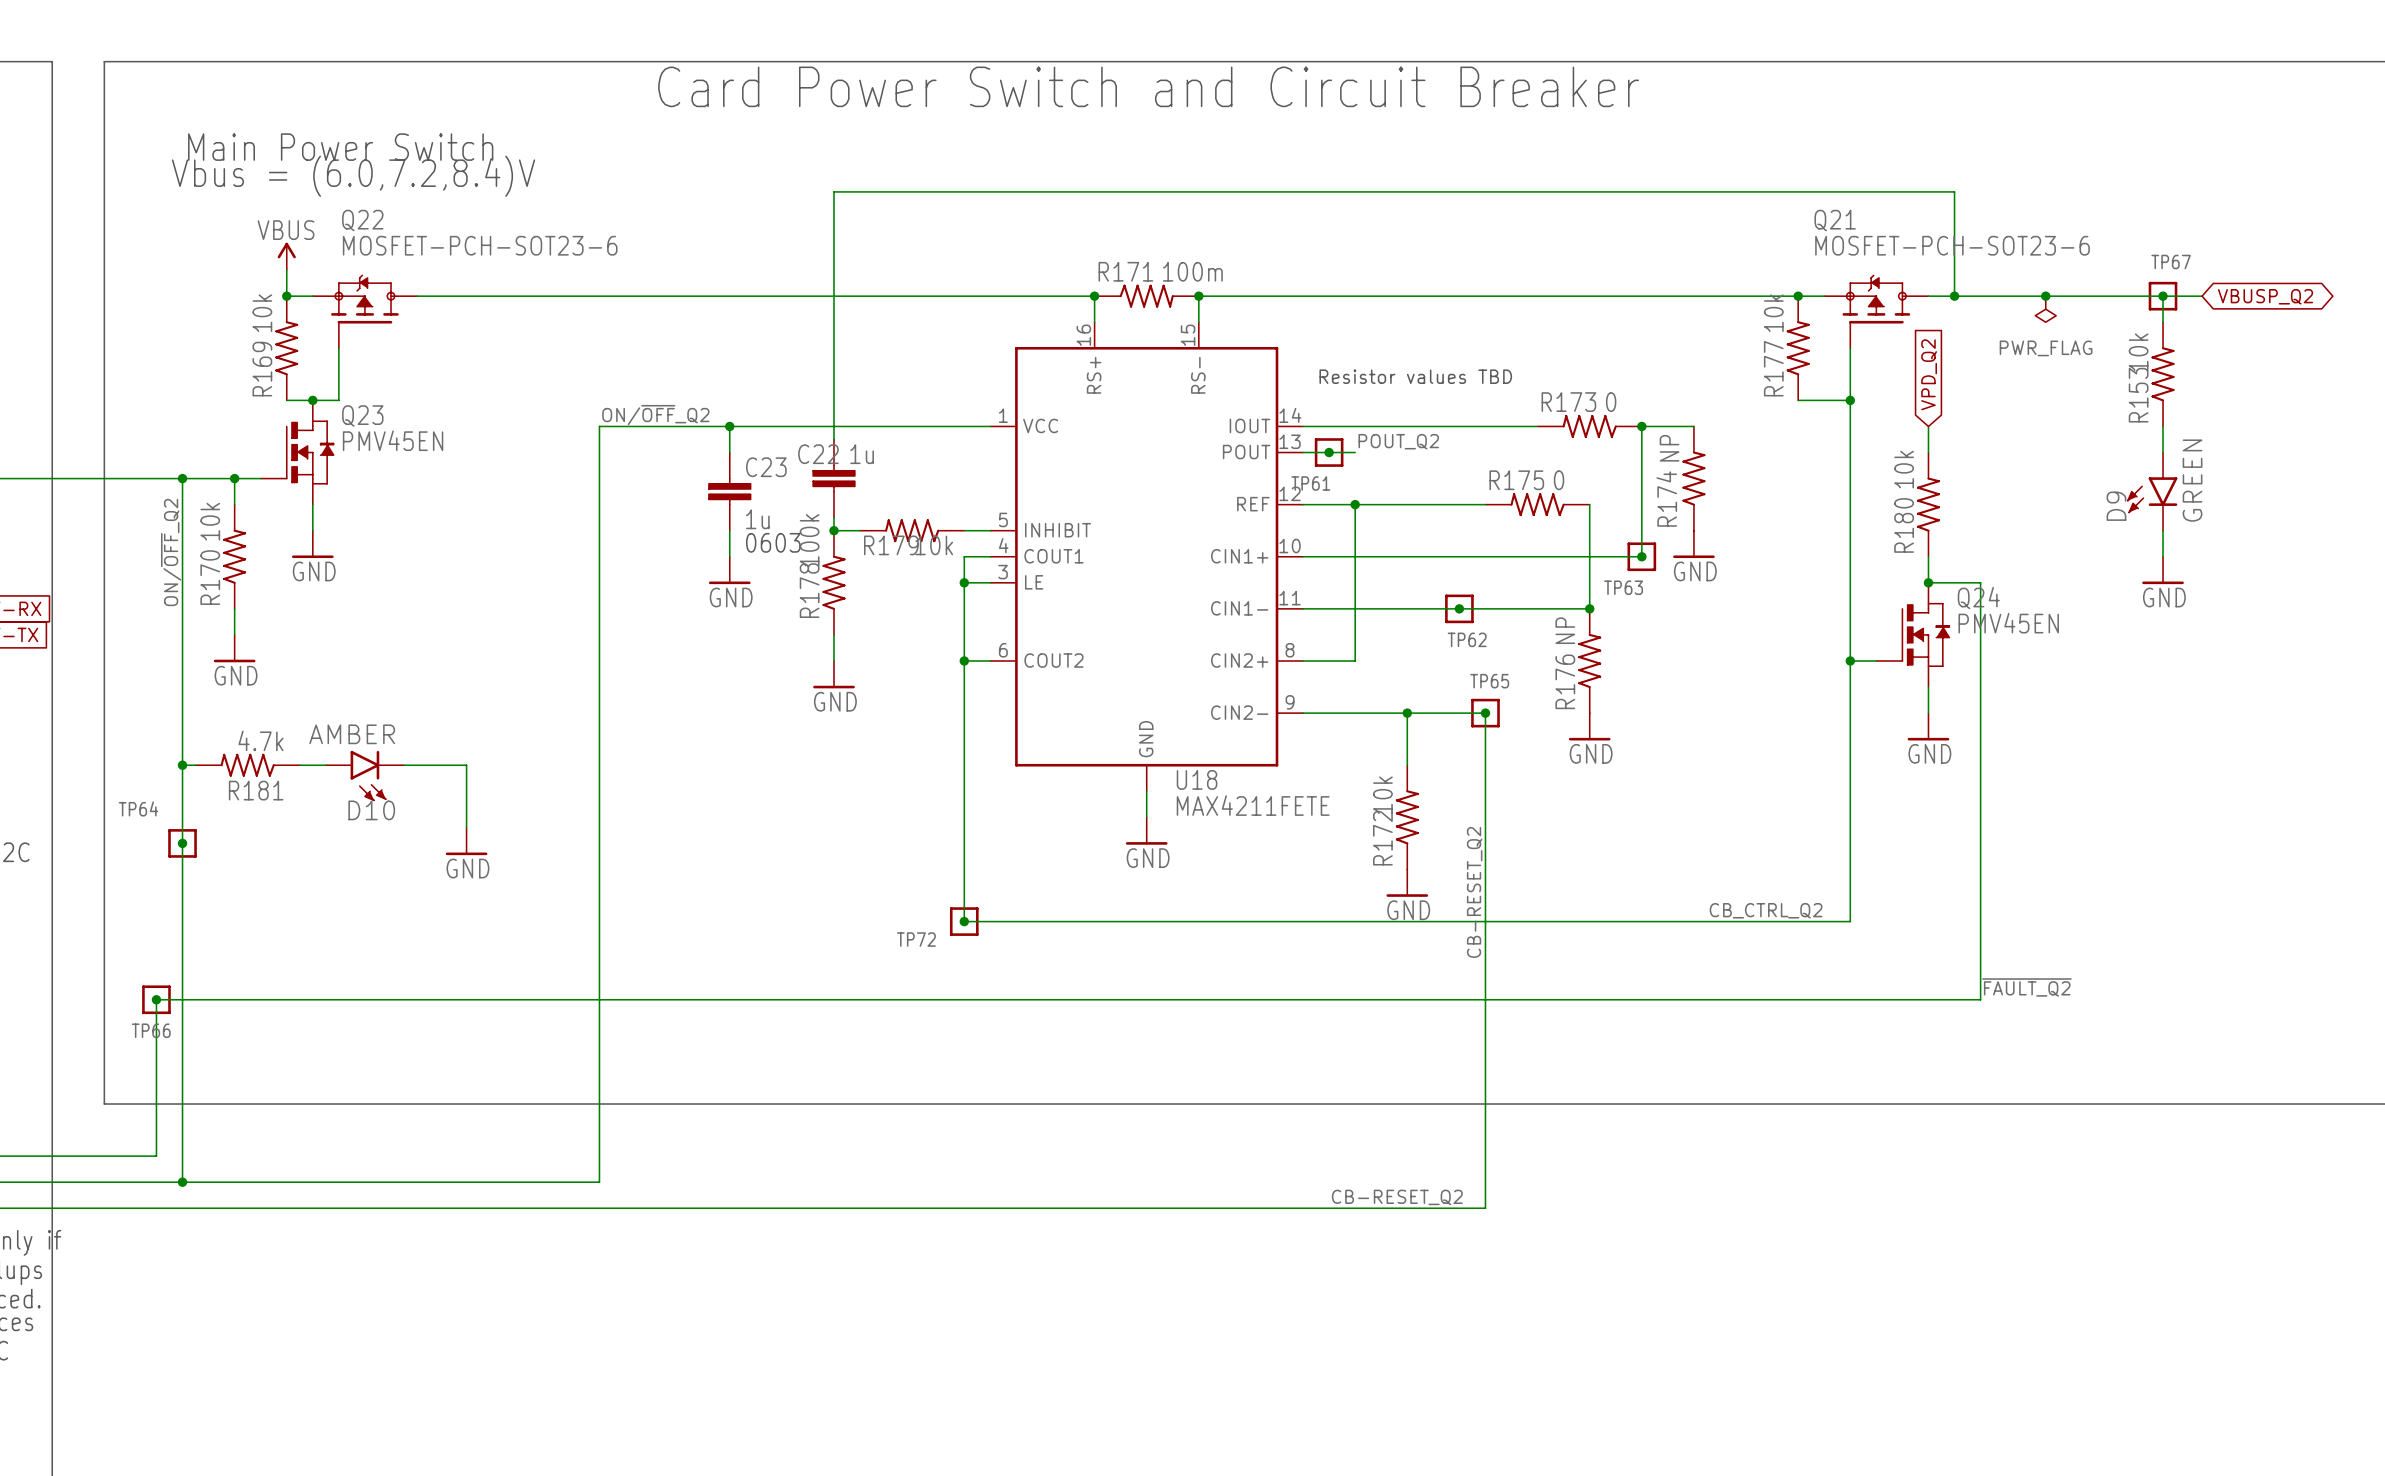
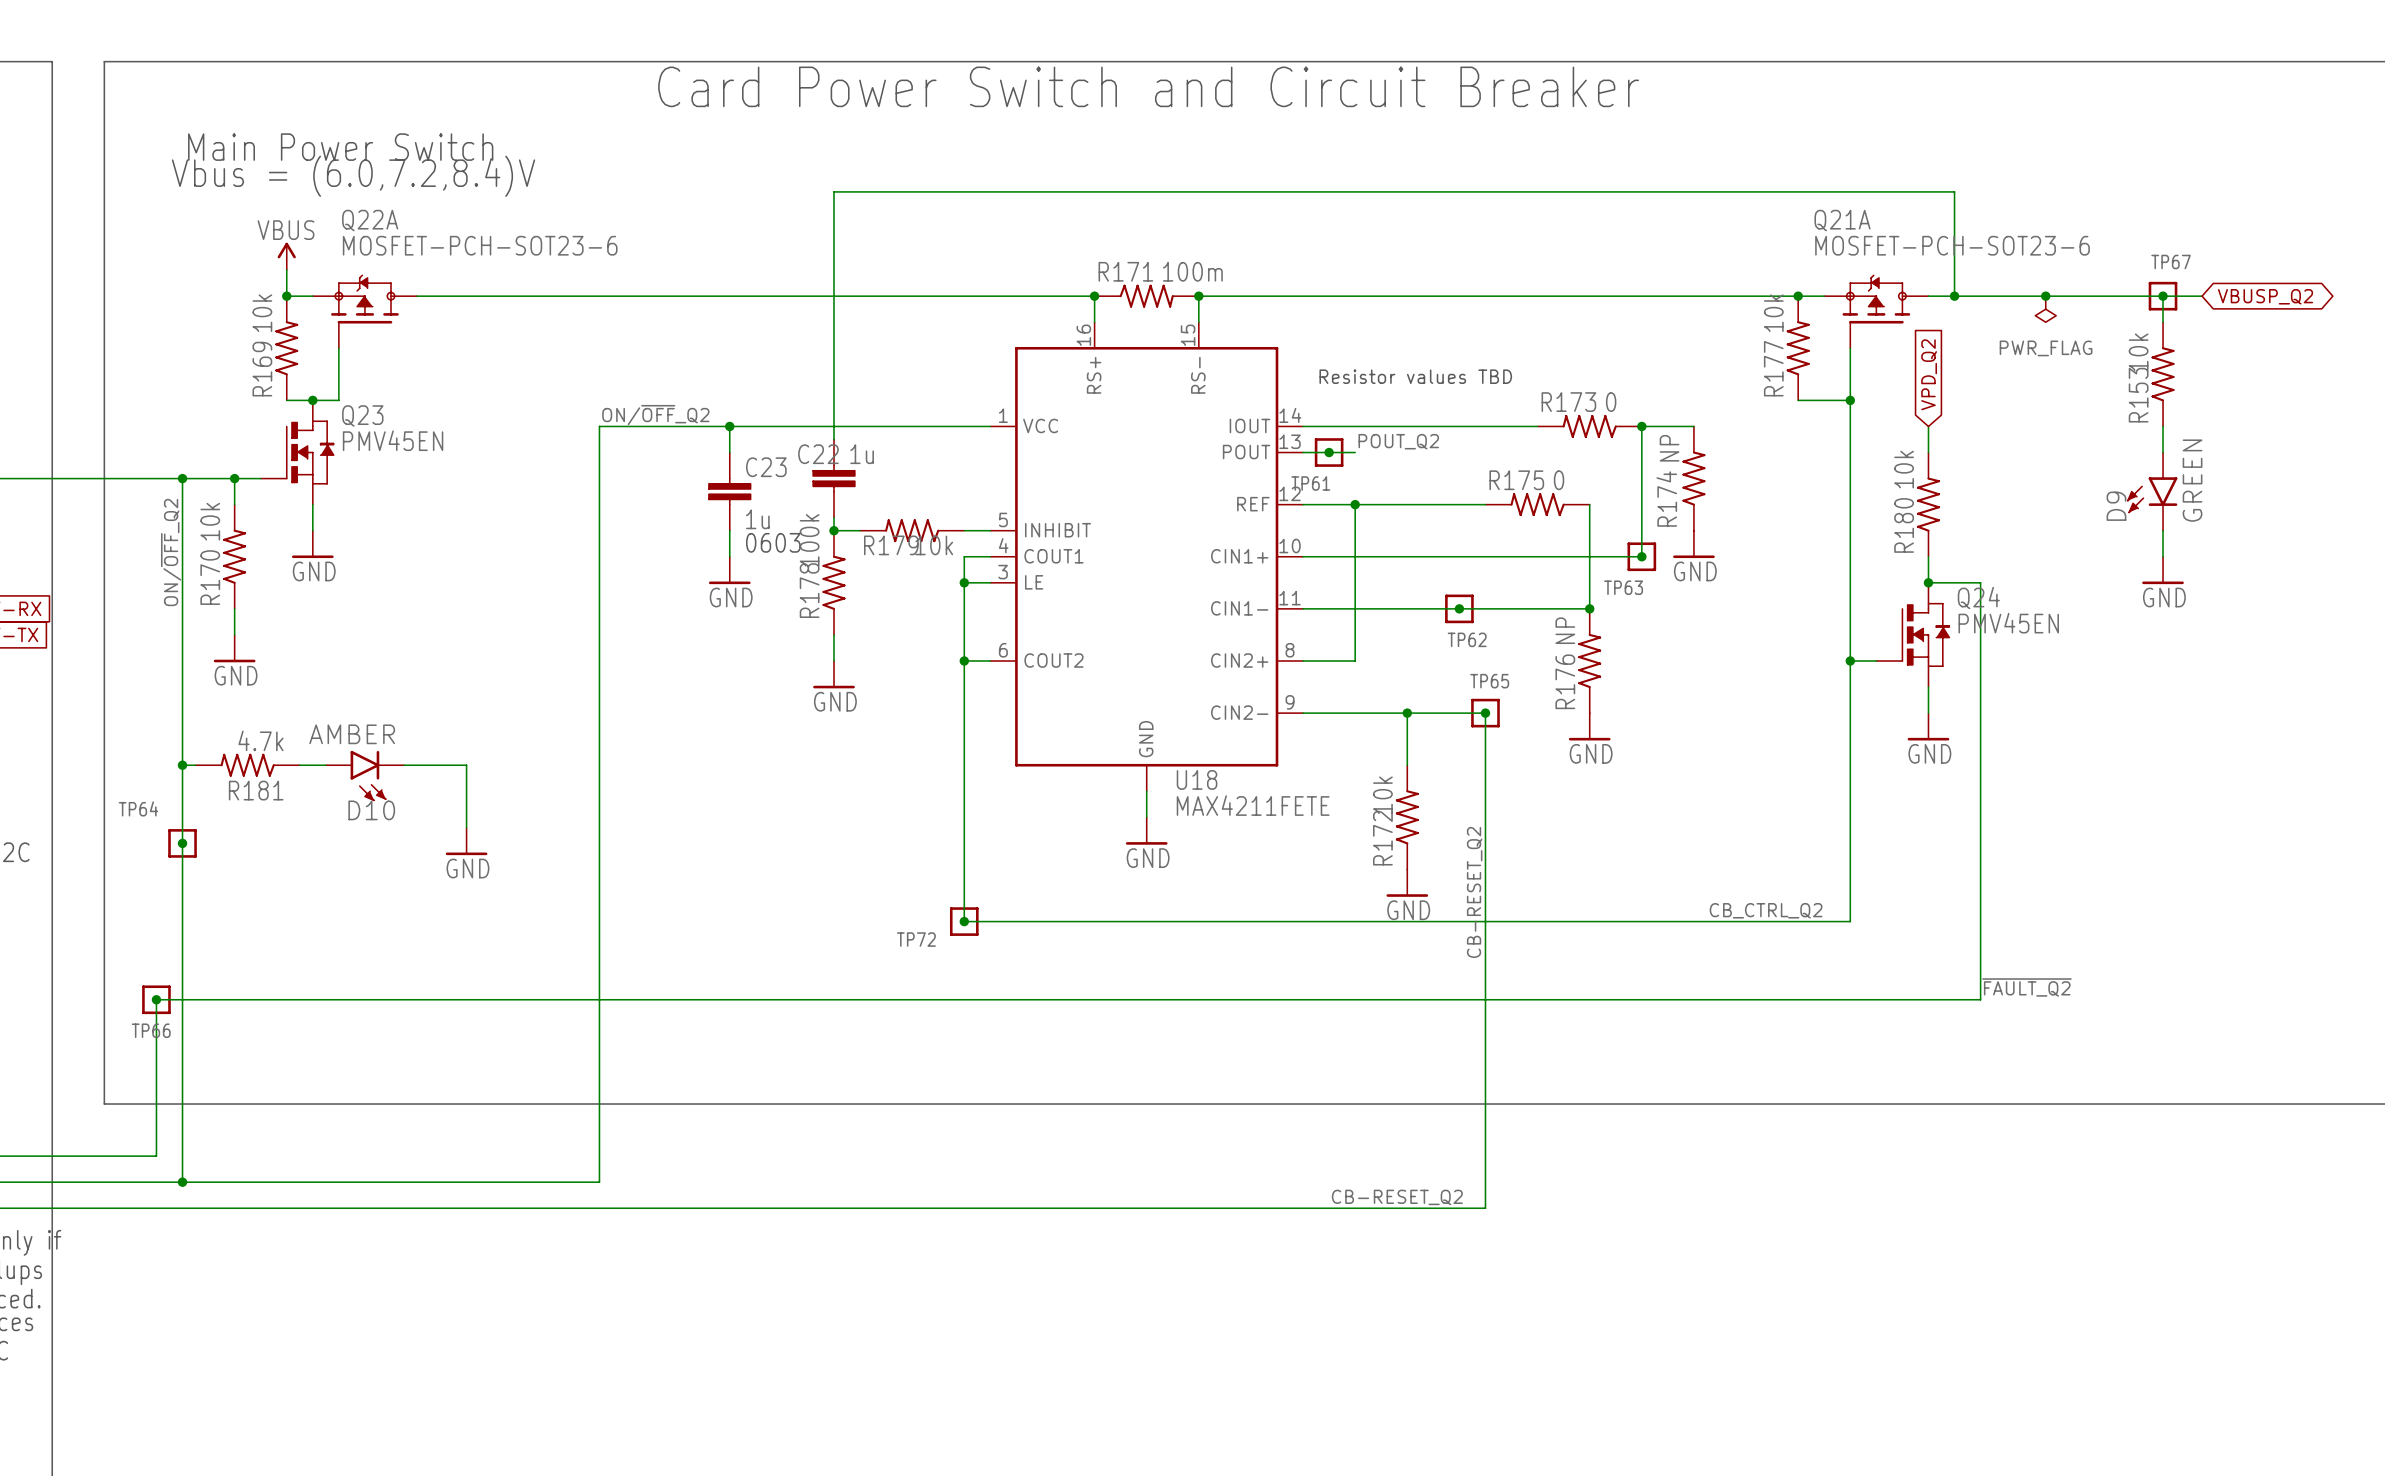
Q22 name: Q22 (362, 220) -> Q22A (370, 220)
Q21 name: Q21 (1835, 220) -> Q21A (1842, 220)

